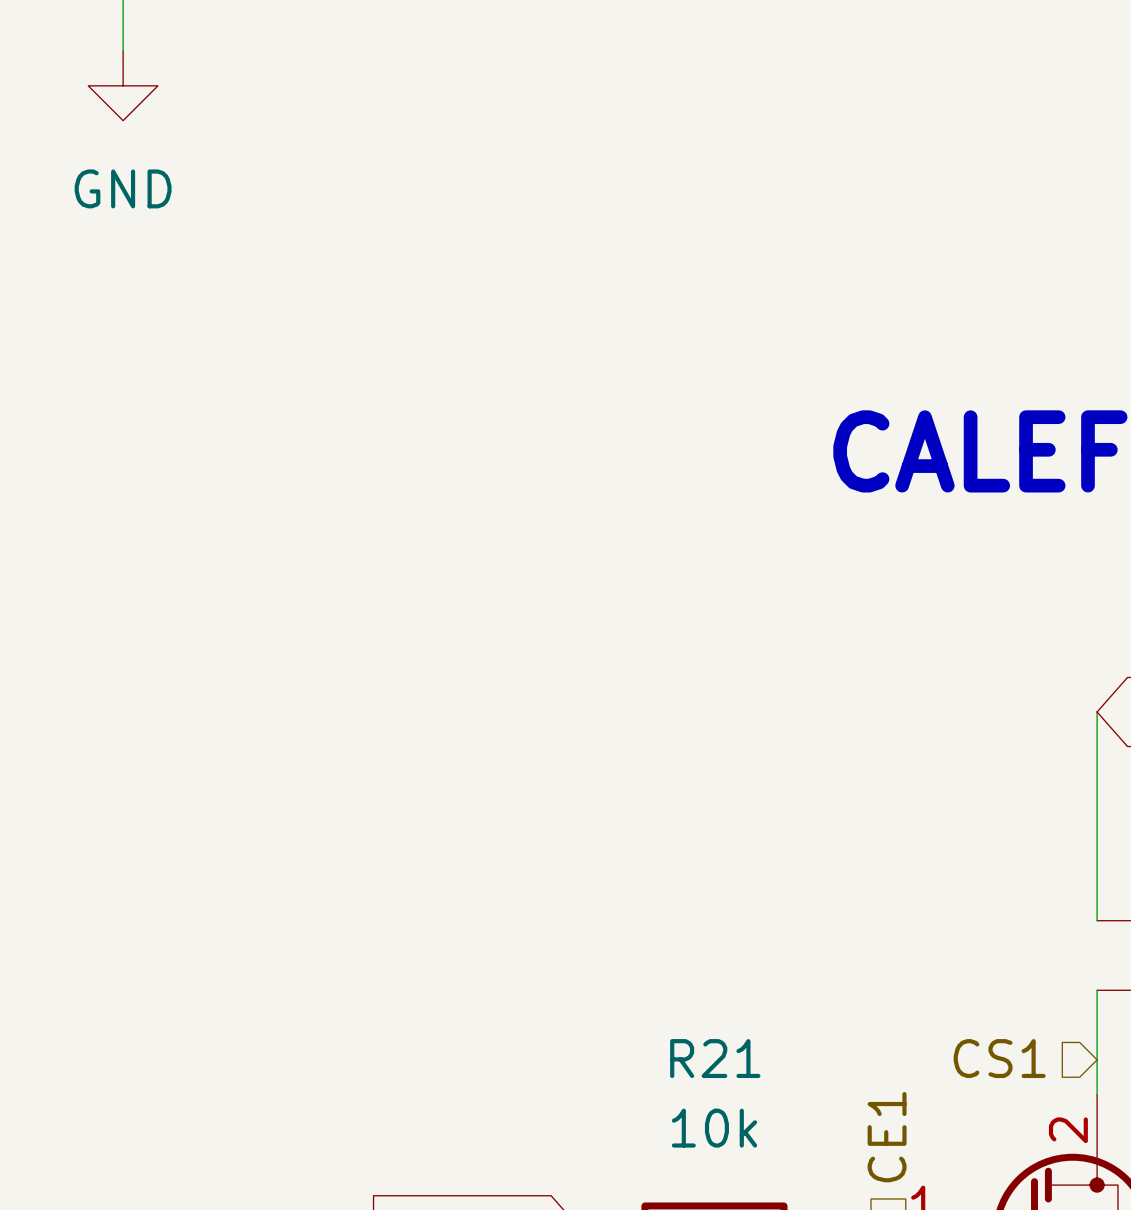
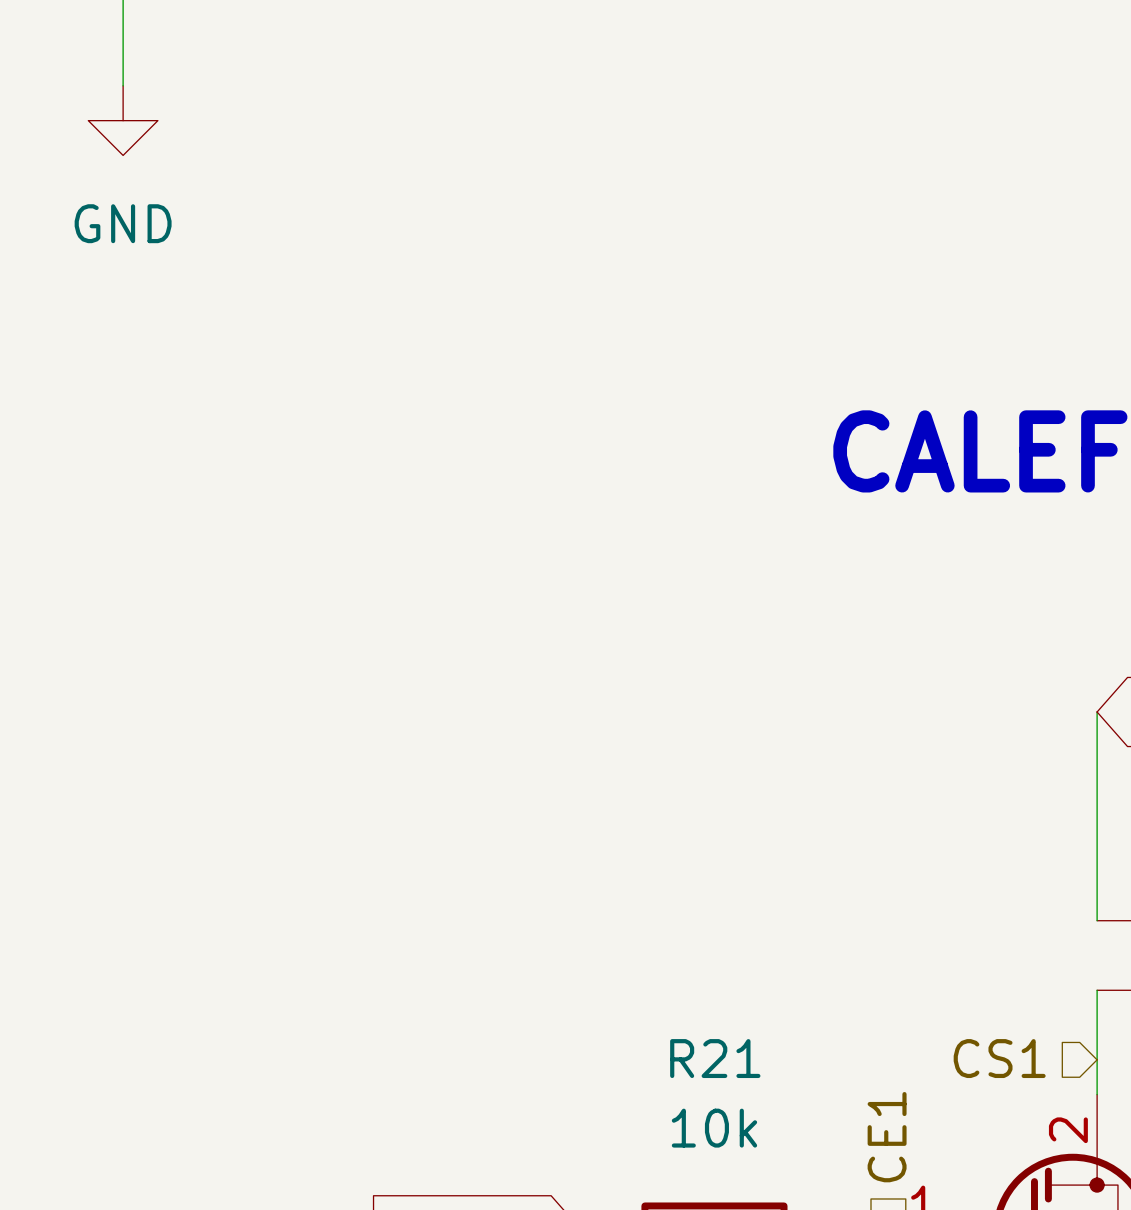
power symbol position: GND (123, 85) -> GND (123, 120)

